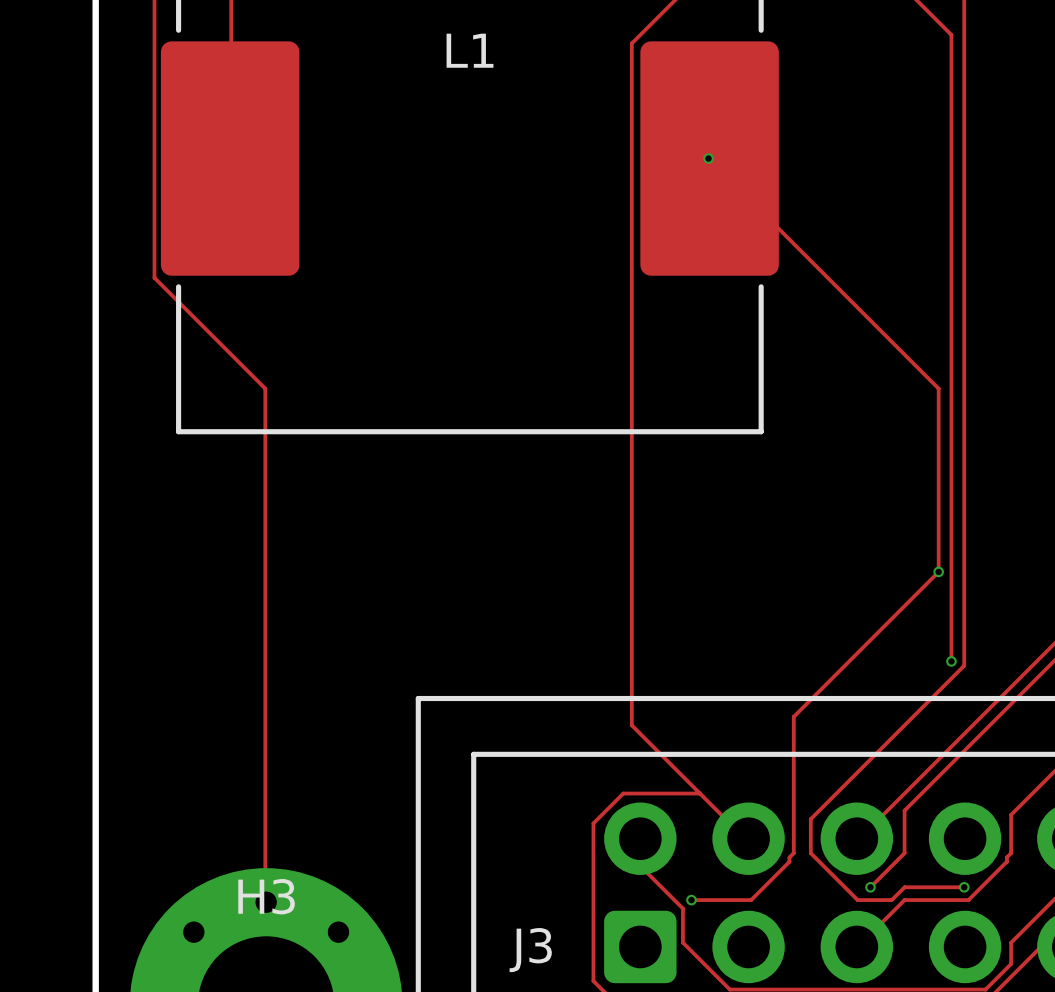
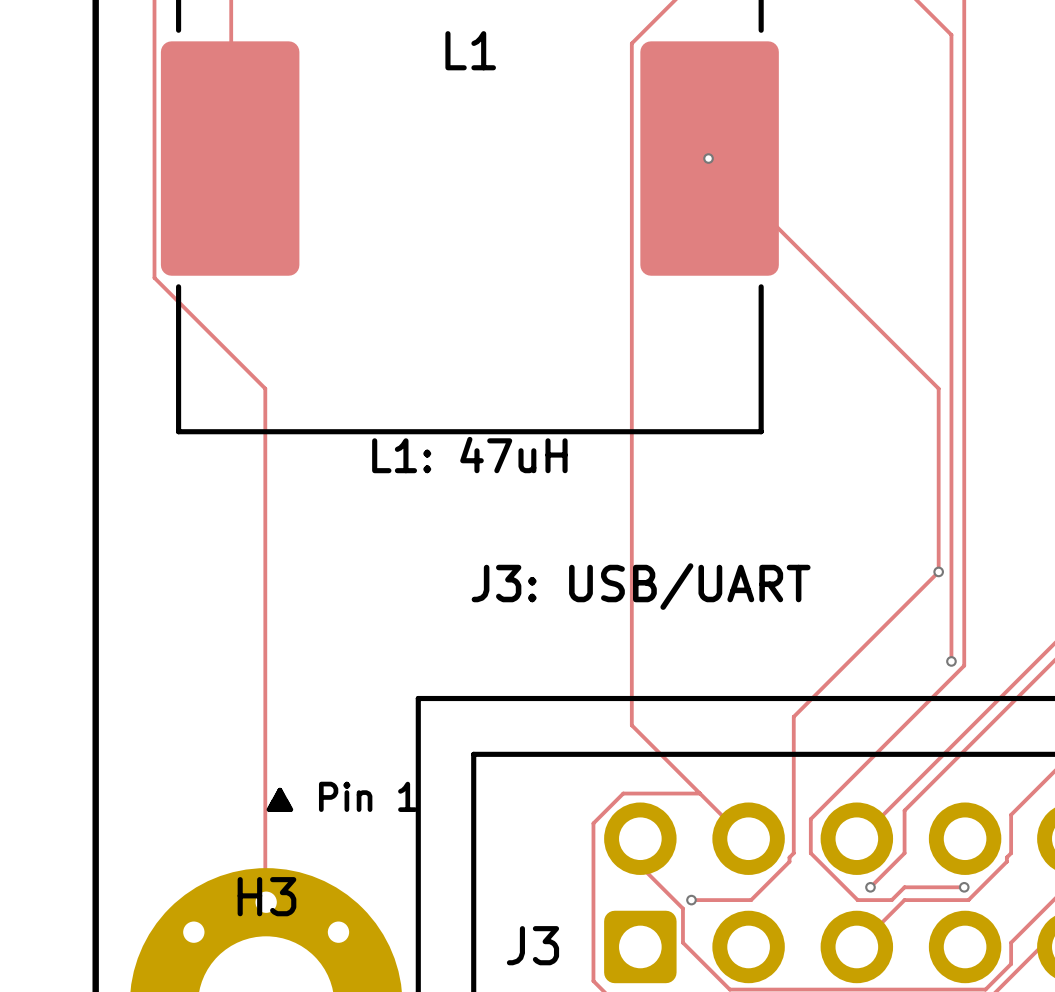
text: none -> L1: 47uH (469, 455)
text: none -> J3: USB/UART (641, 586)
text: none -> ▲ Pin 1 (342, 796)

